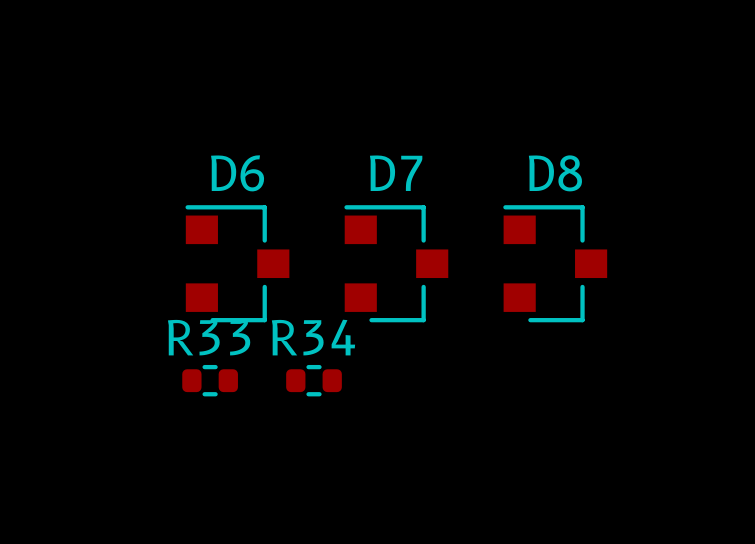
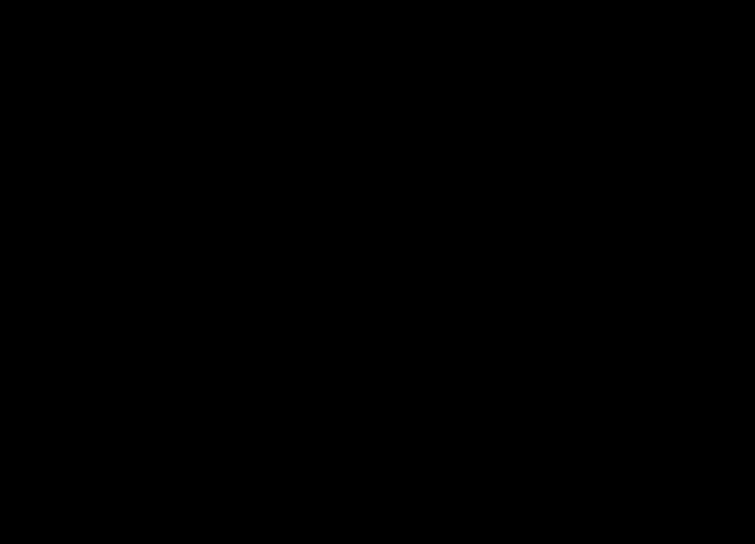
D6: (237, 263) -> none
D7: (396, 263) -> none
D8: (555, 263) -> none
R33: (210, 380) -> none
R34: (314, 380) -> none

